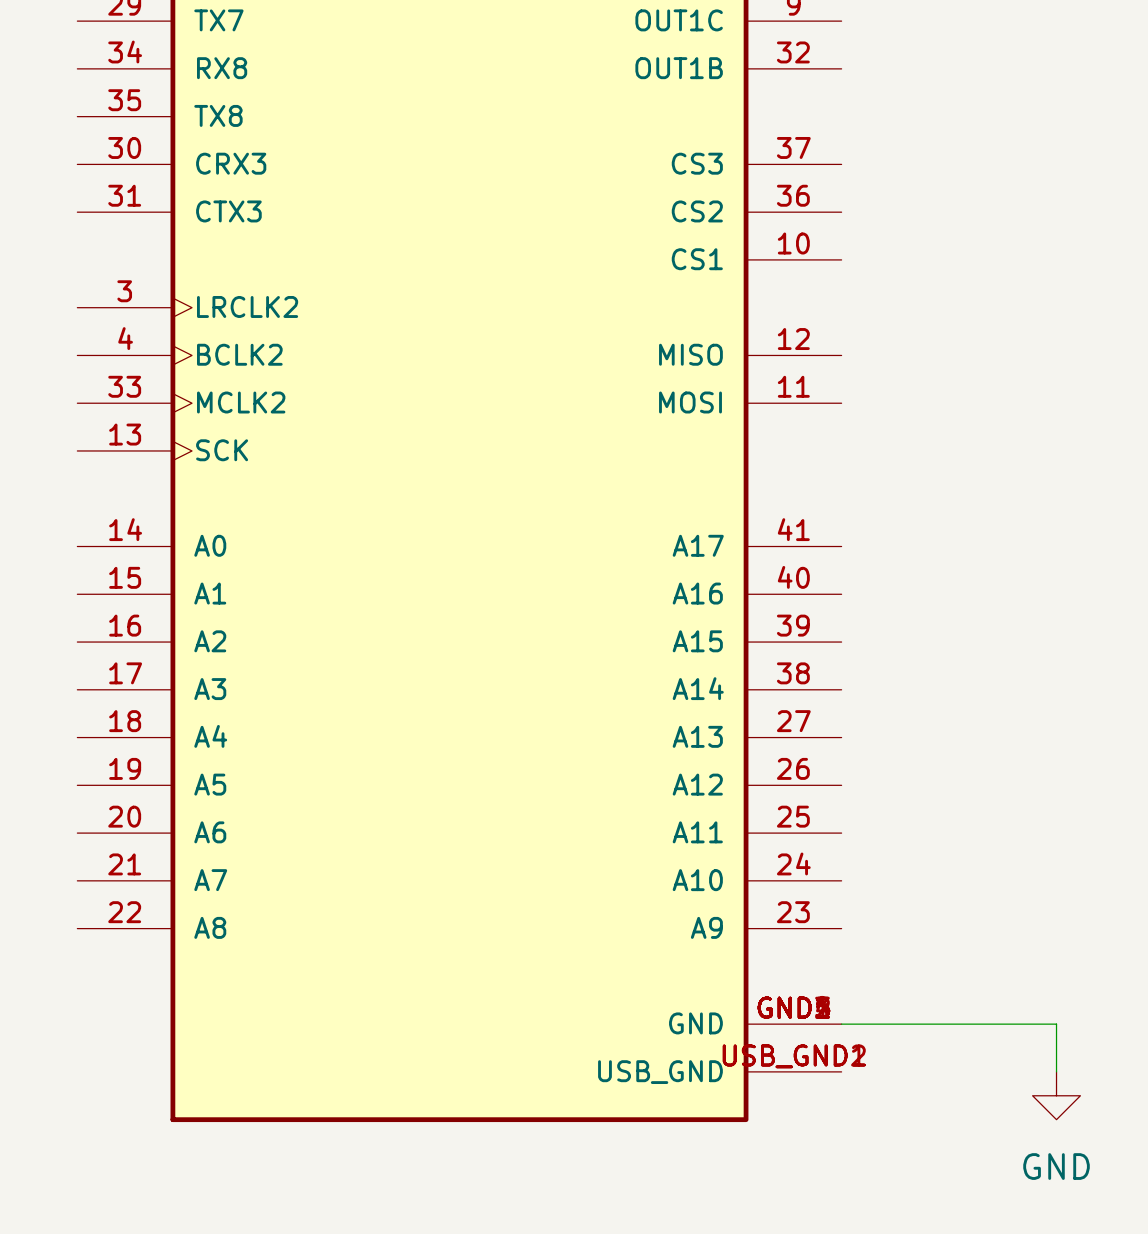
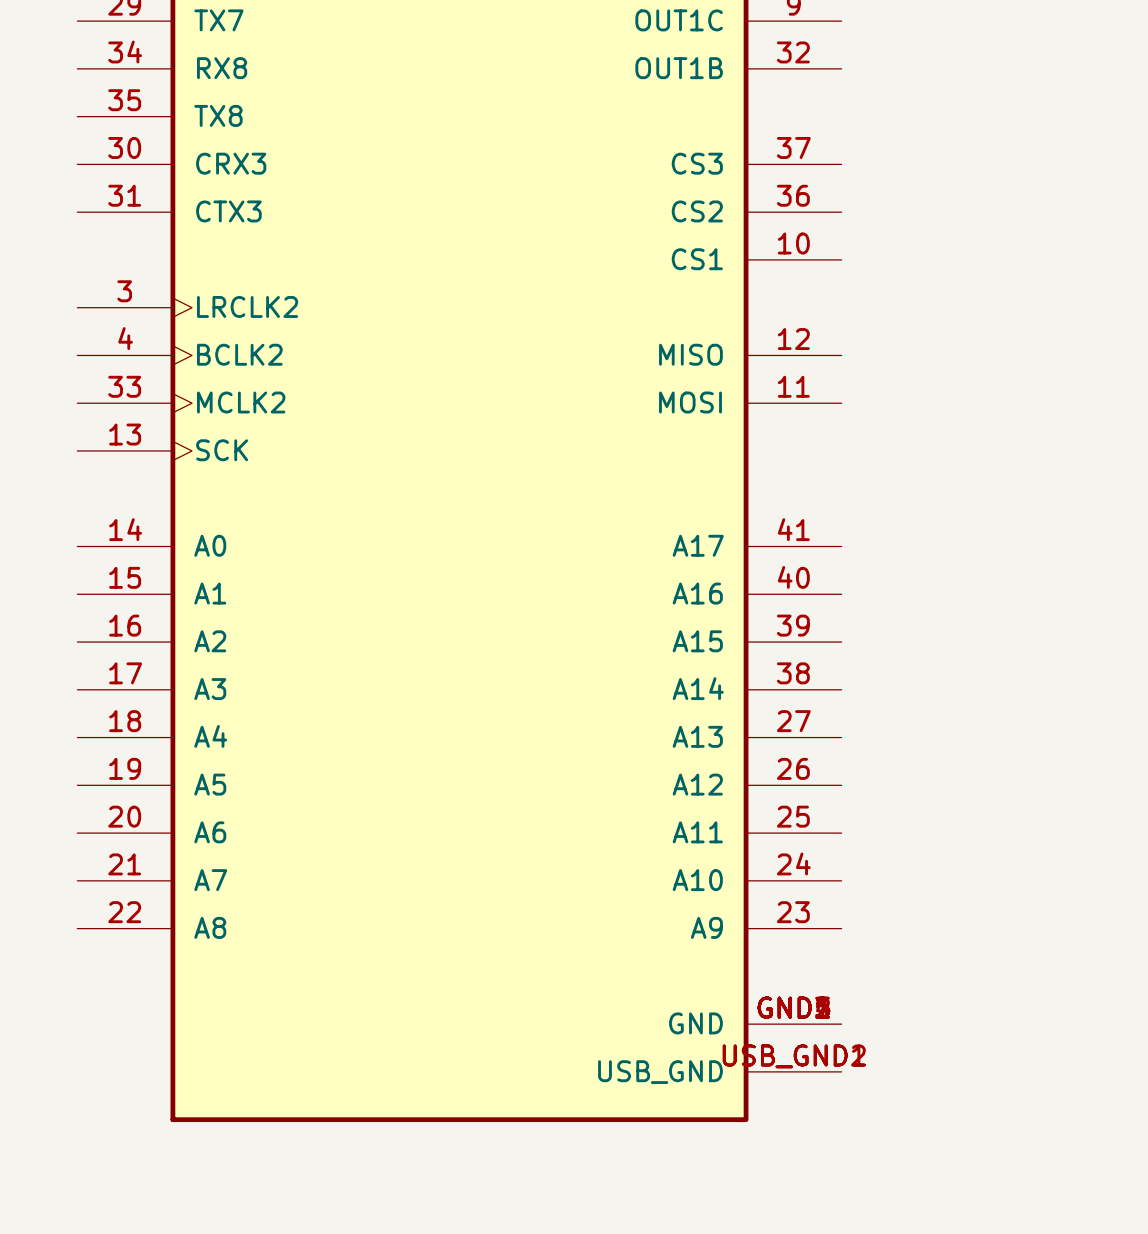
wire: (841, 1024) (1056, 1024) (1056, 1071) -> none
power symbol: GND (1056, 1095) -> none

